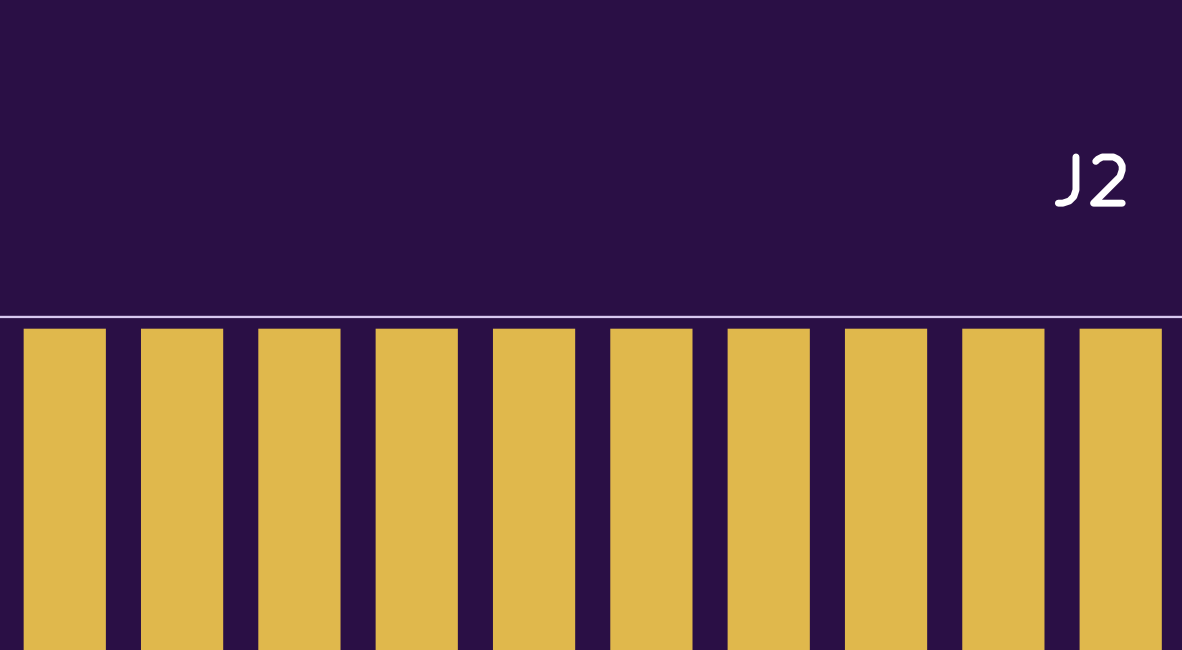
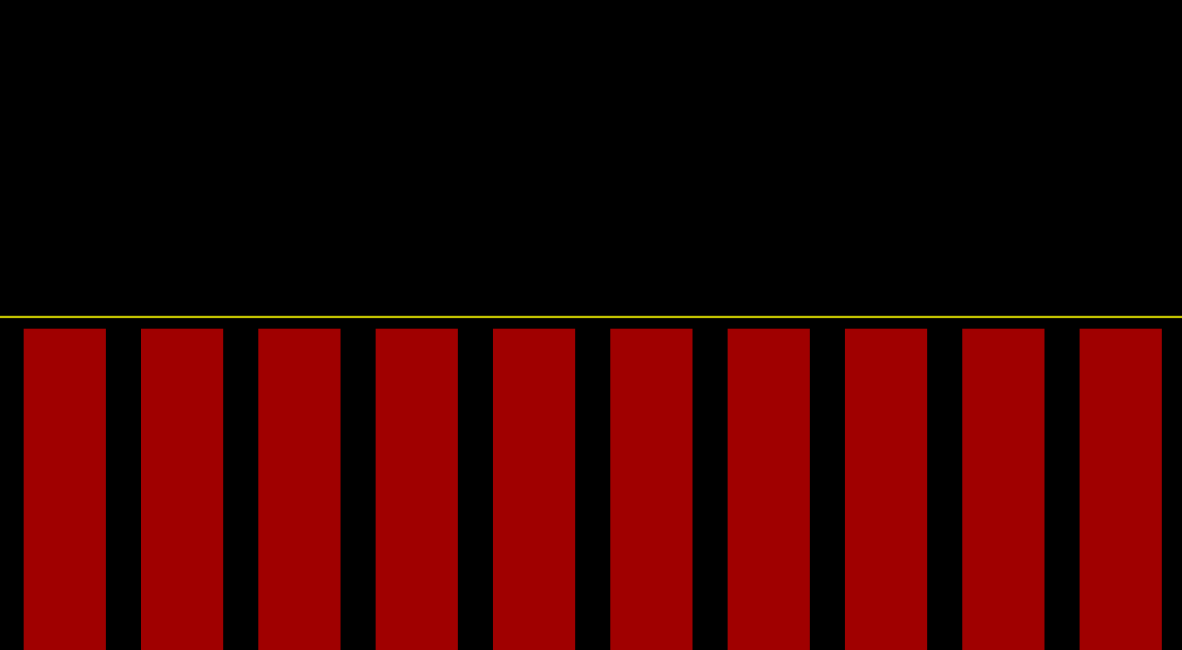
J2 name: J2 (1090, 180) -> none

